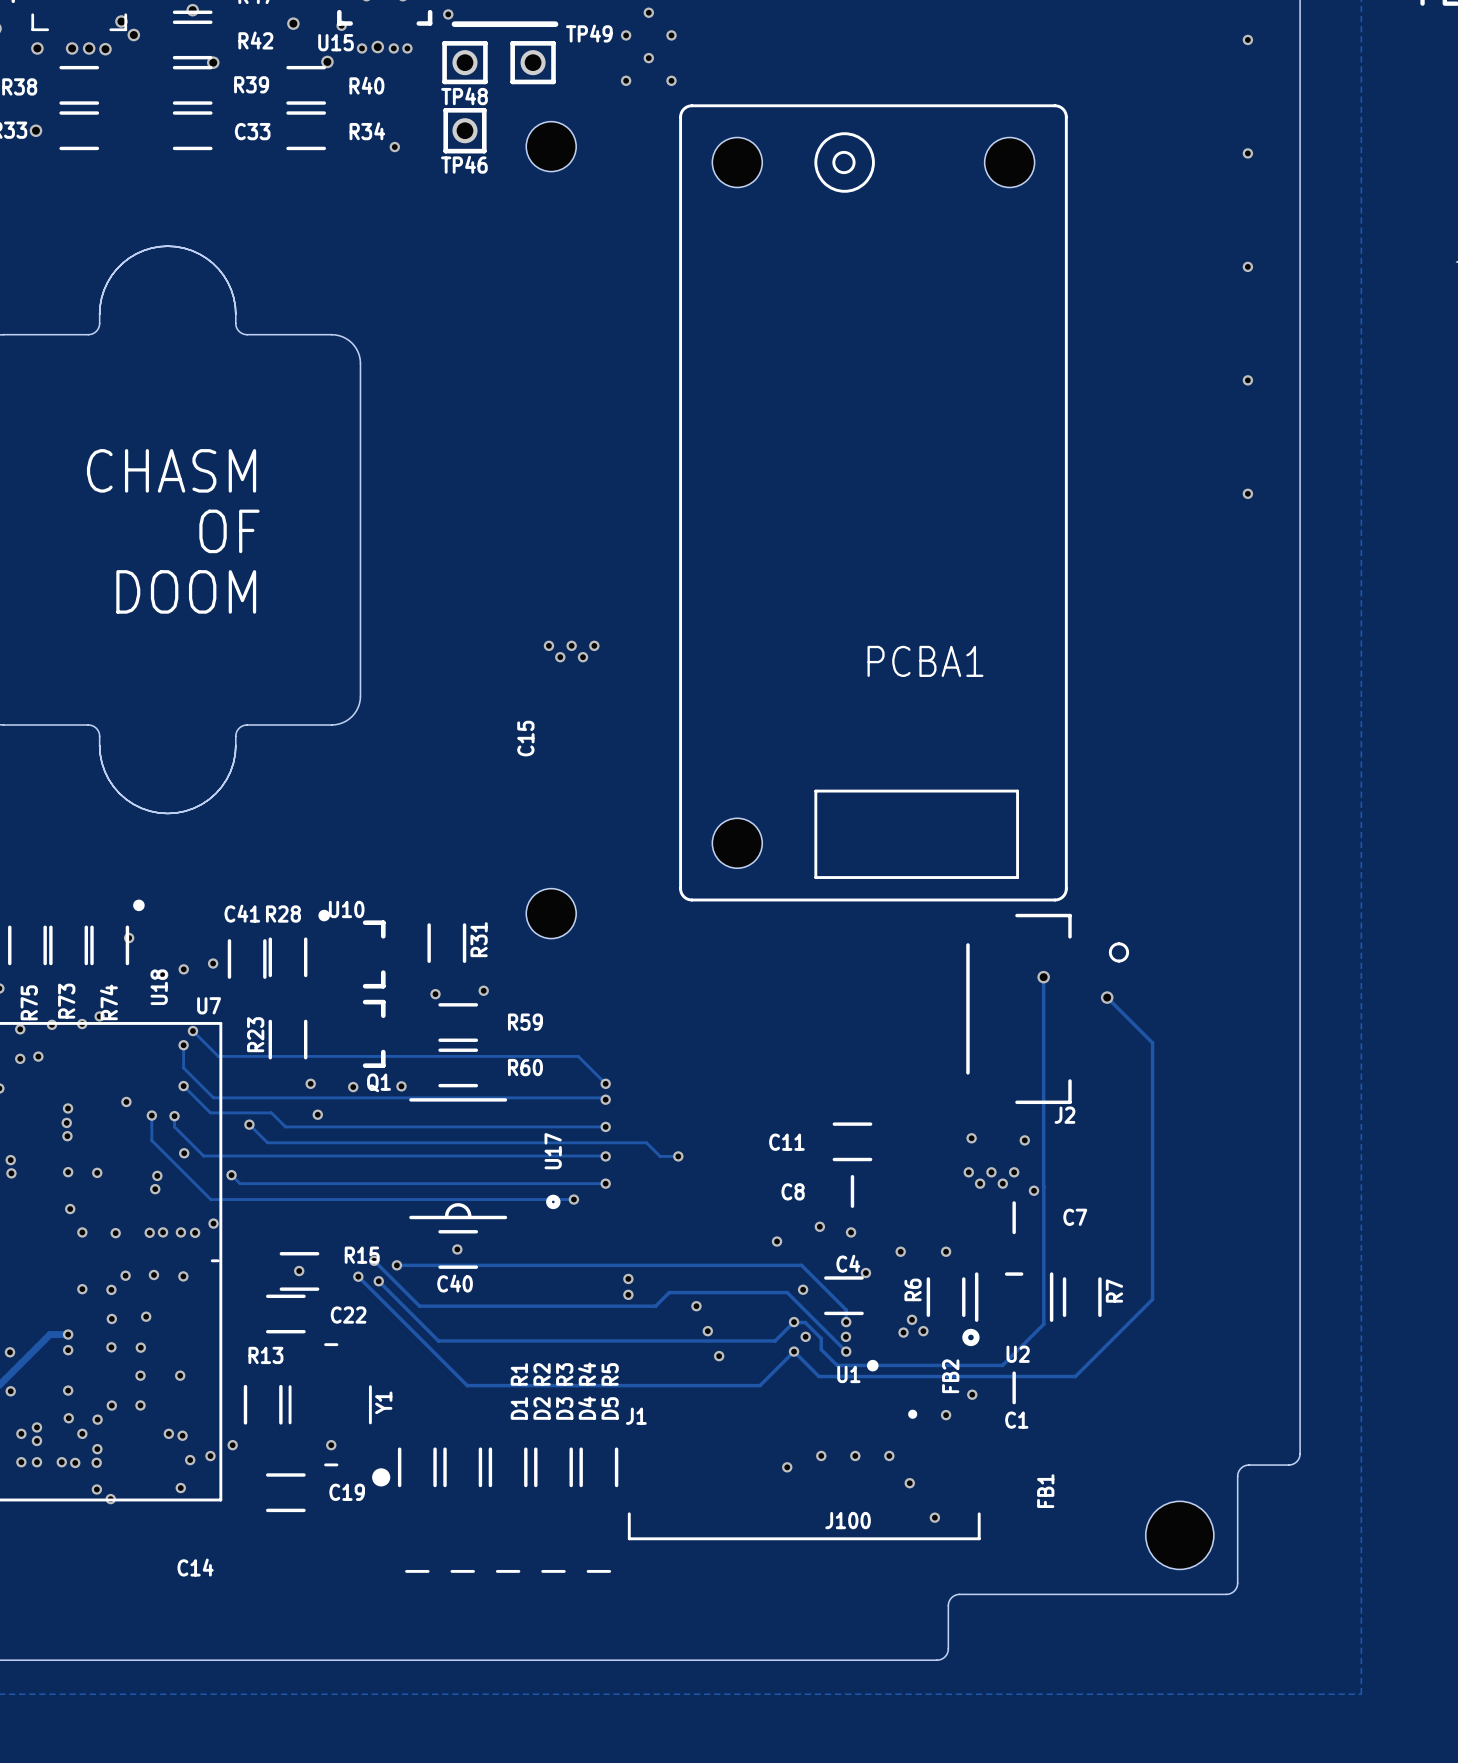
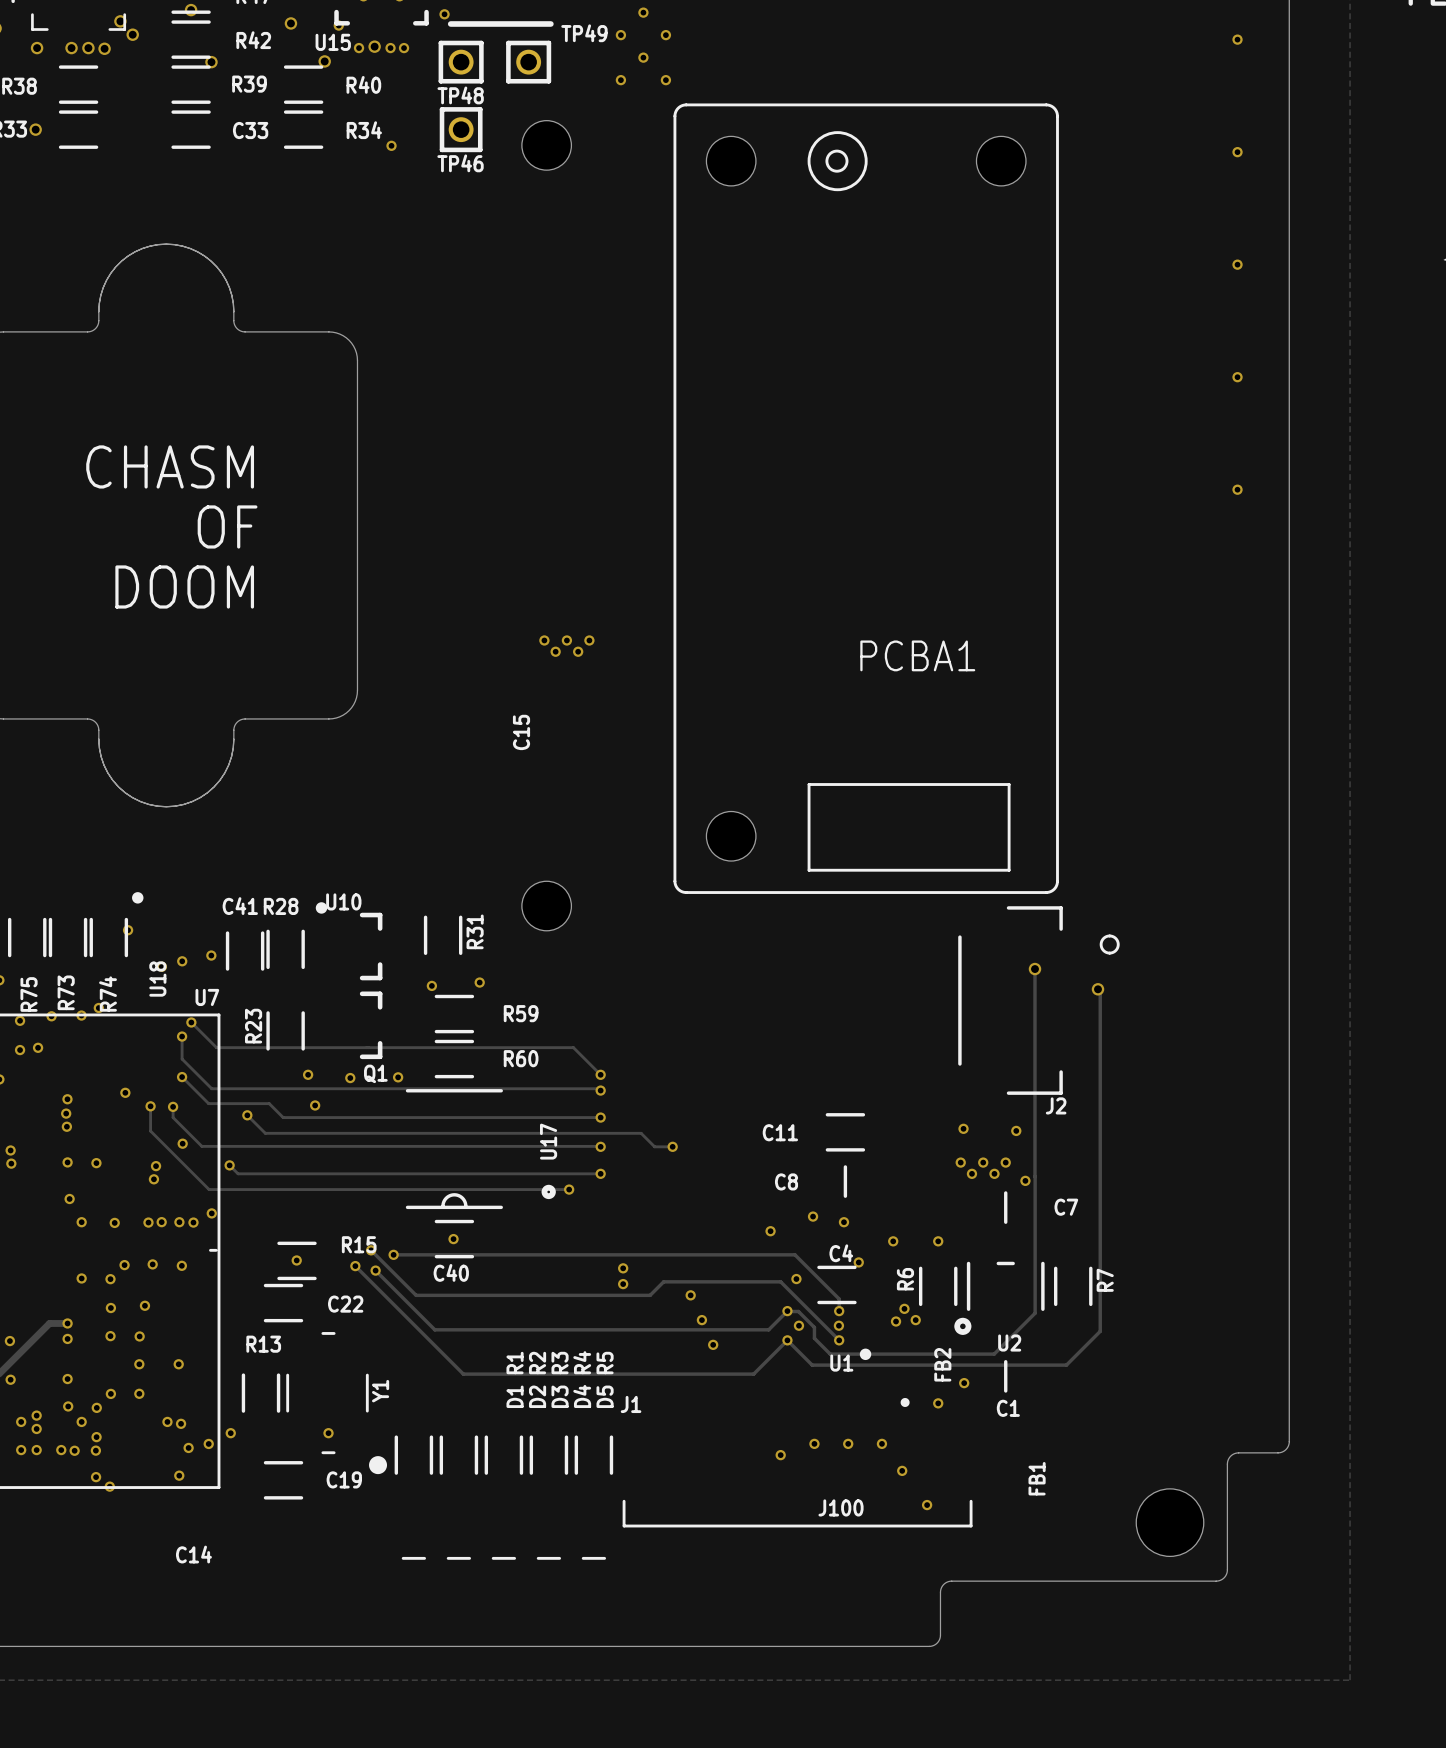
track: (1109, 999) (1152, 1042) (1152, 1299) (1109, 1342) -> (1100, 991) (1100, 1331)

